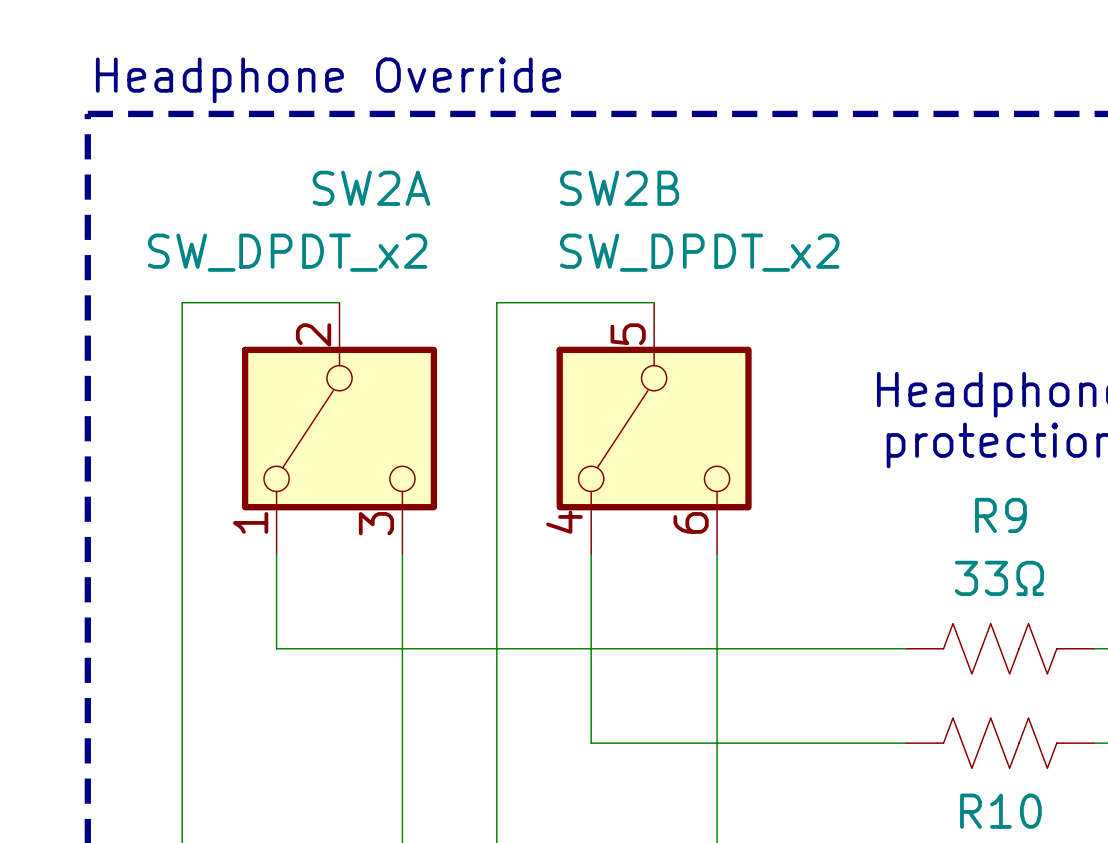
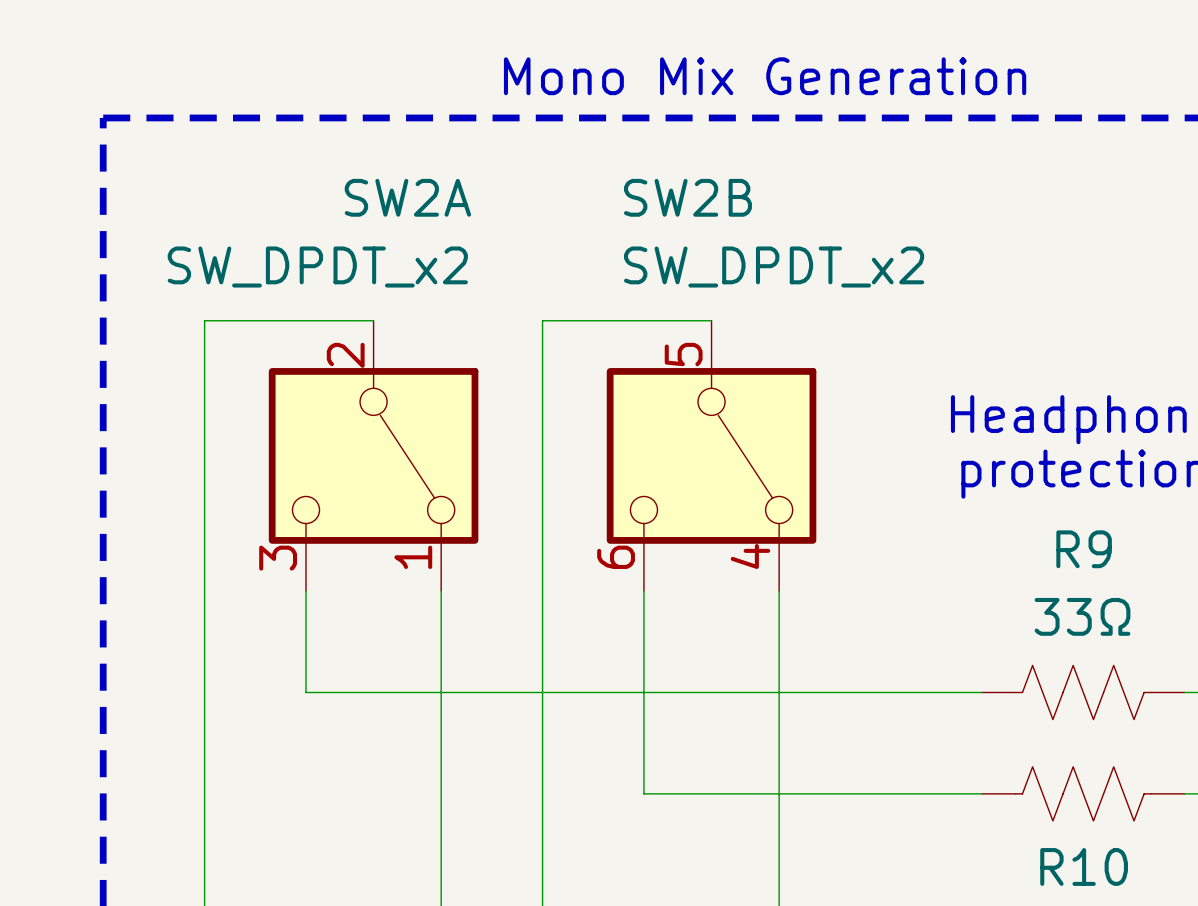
text: none -> Mono Mix Generation (765, 76)
text: Headphone Override (328, 80) -> none
SW2A flip: as is (339, 428) -> left-right (373, 455)
SW2B flip: as is (654, 428) -> left-right (711, 455)

